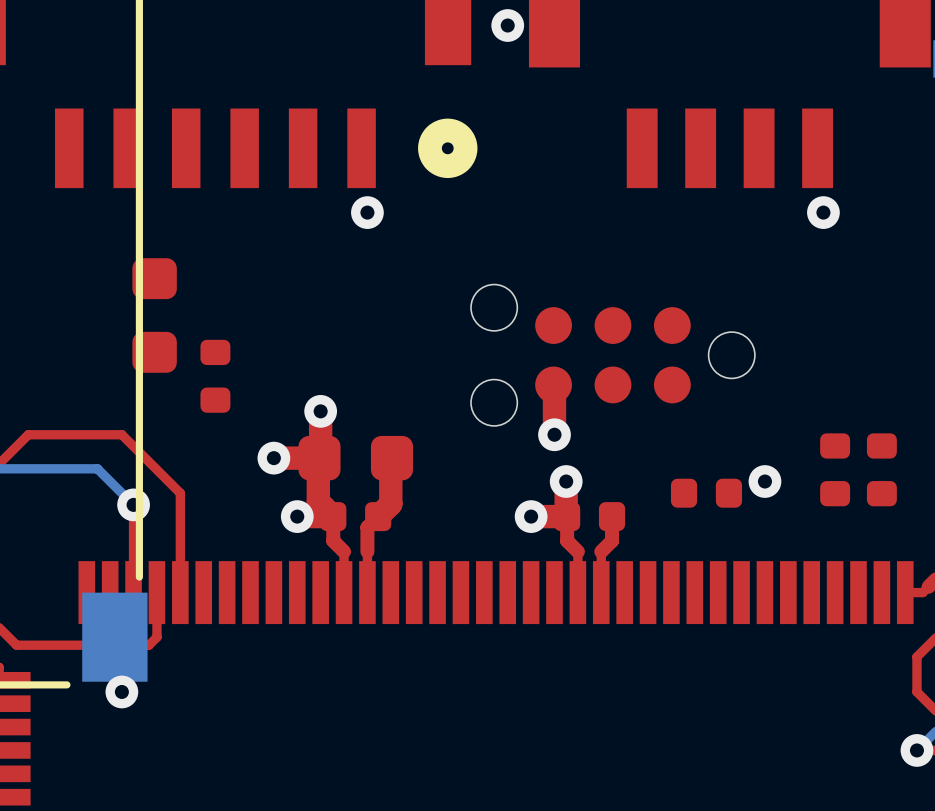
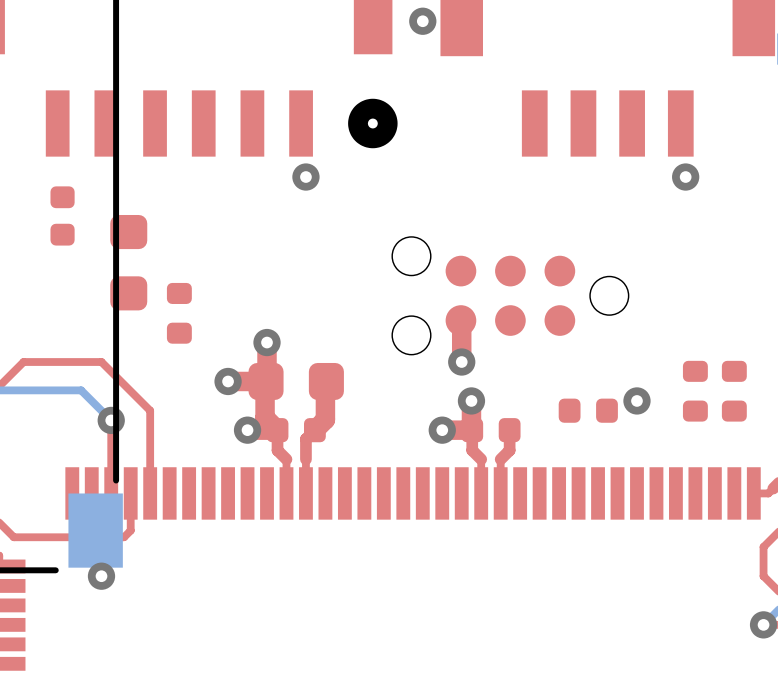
part: none -> (62, 215)

